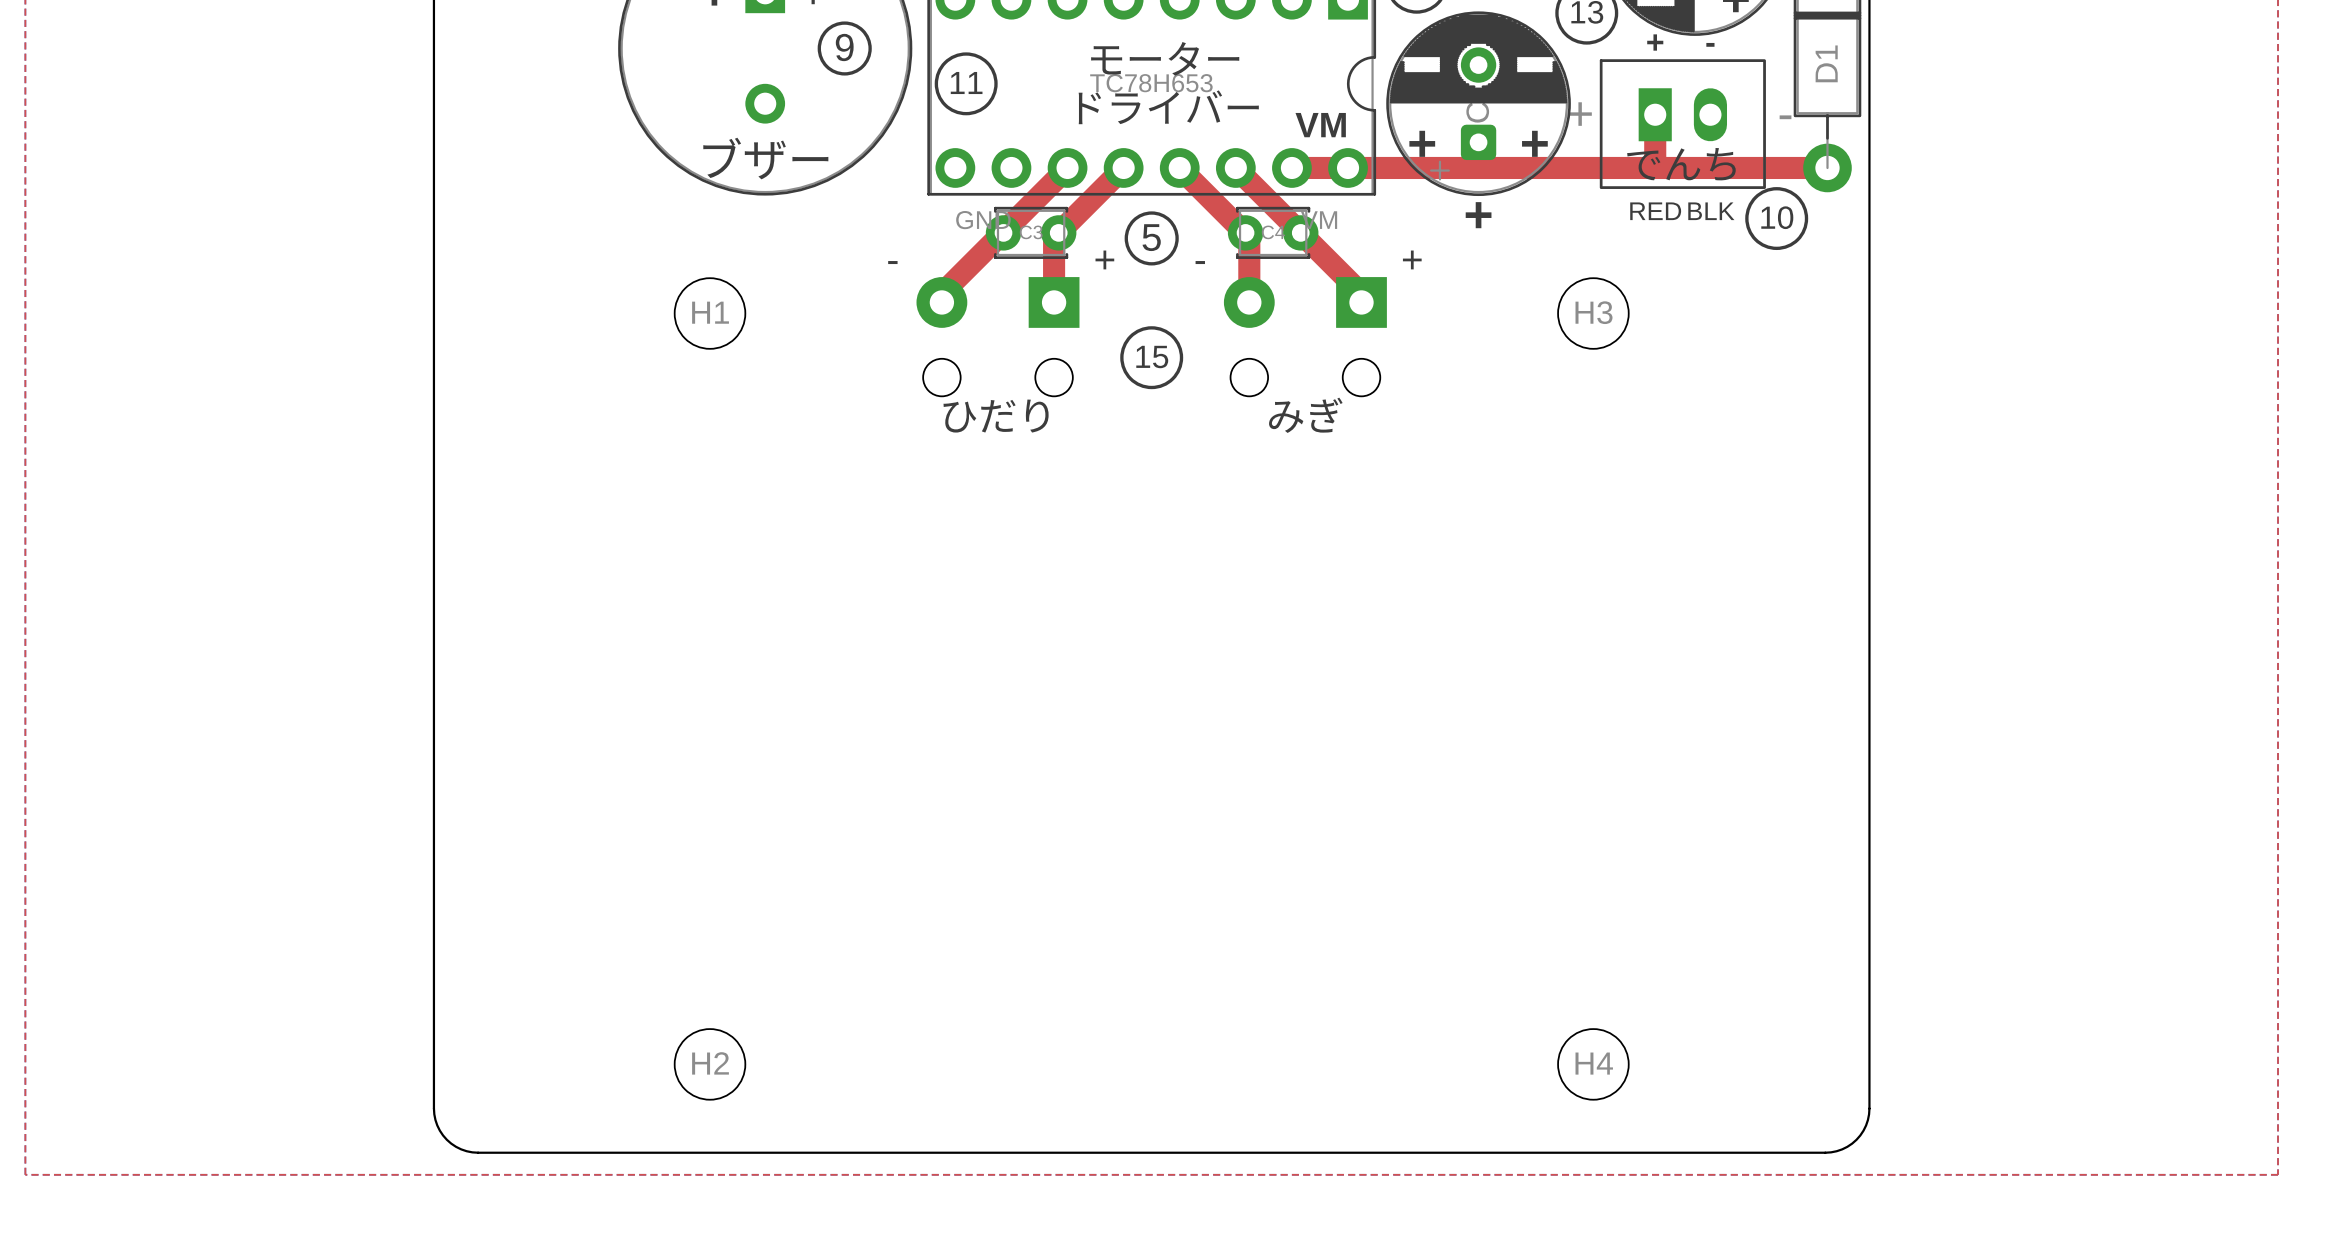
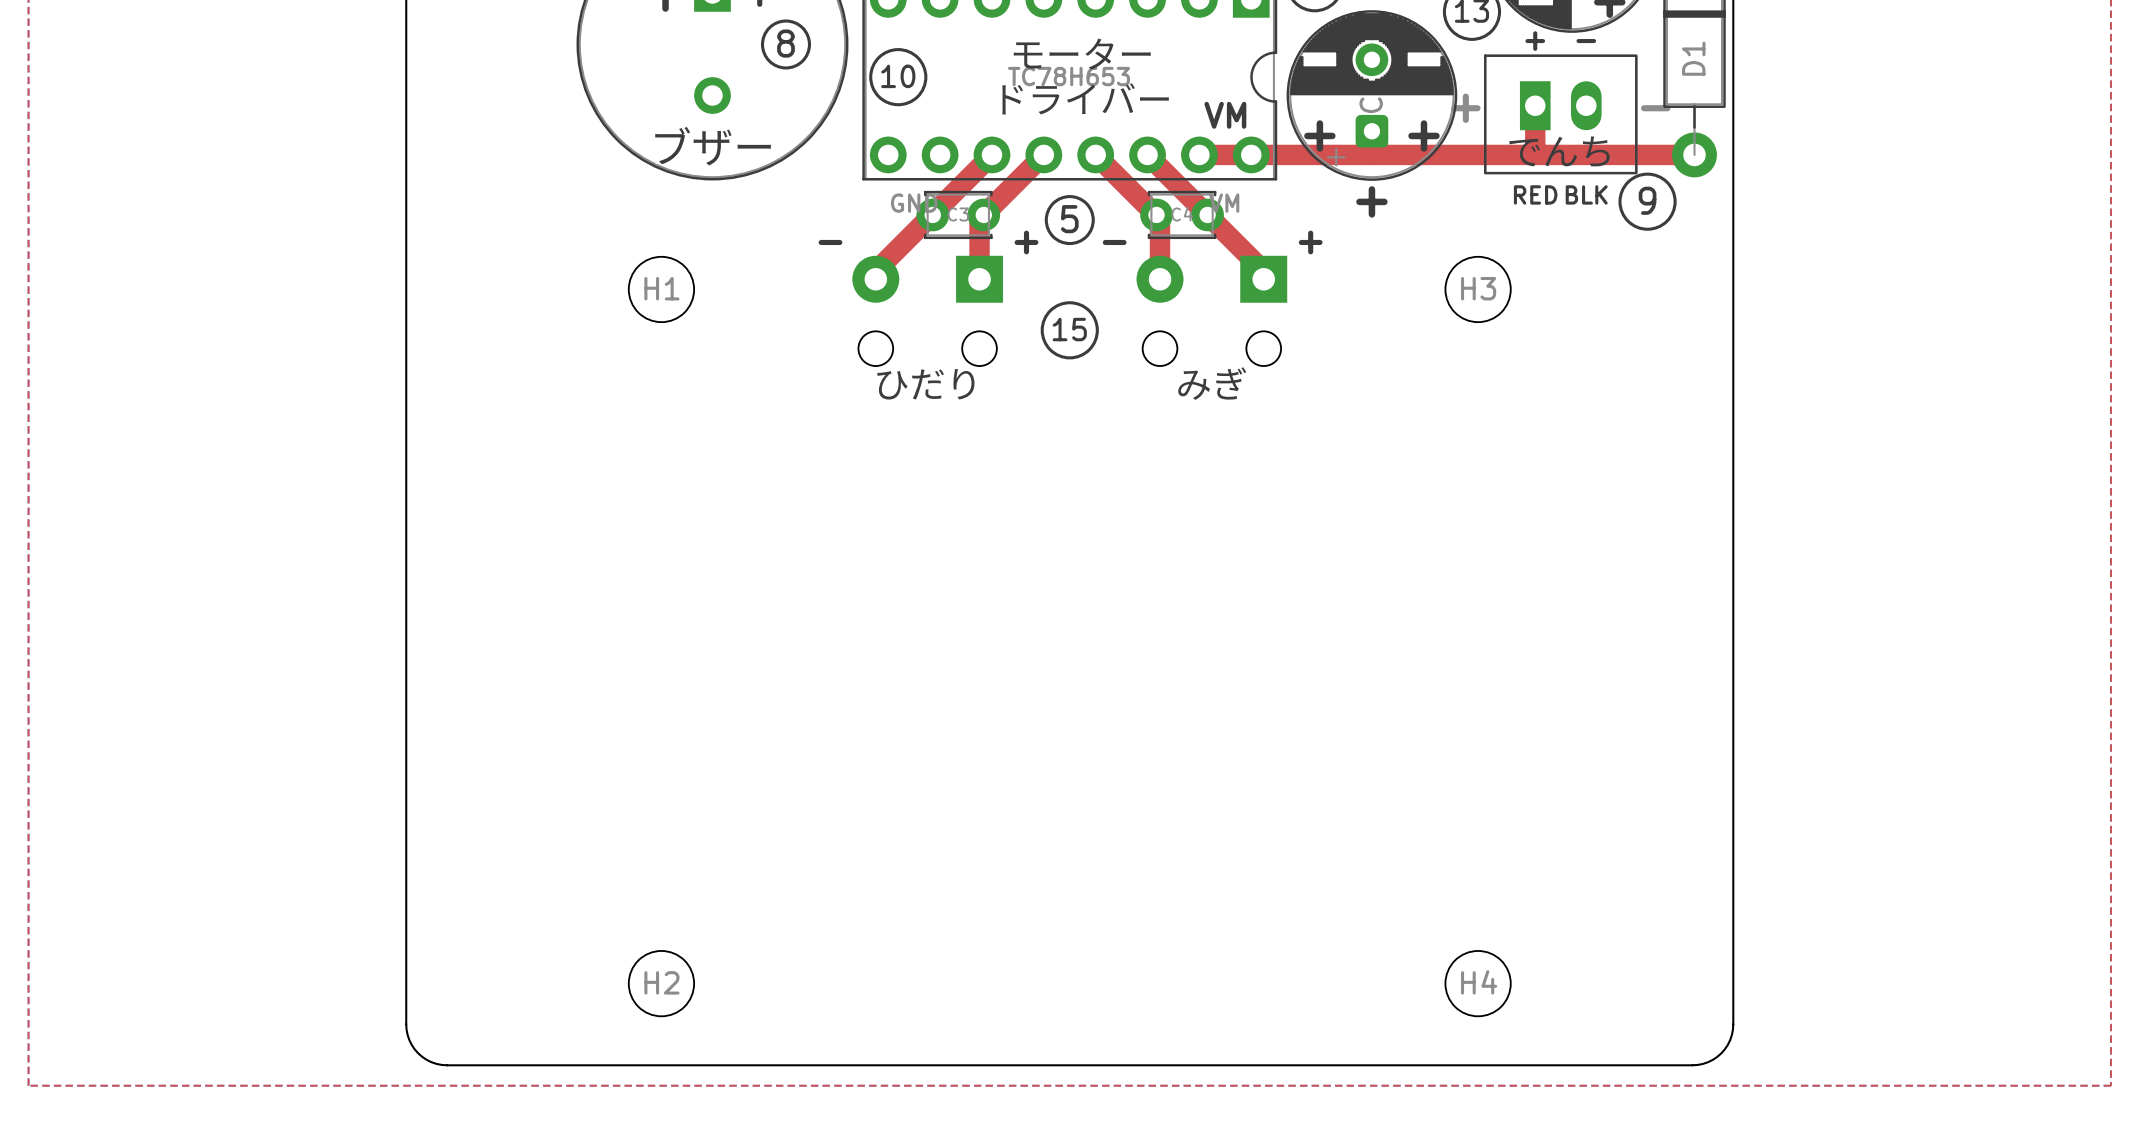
text: 9 (844, 47) -> 8 (785, 43)
text: 11 (966, 83) -> 10 (898, 76)
text: 10 (1777, 217) -> 9 (1647, 200)

